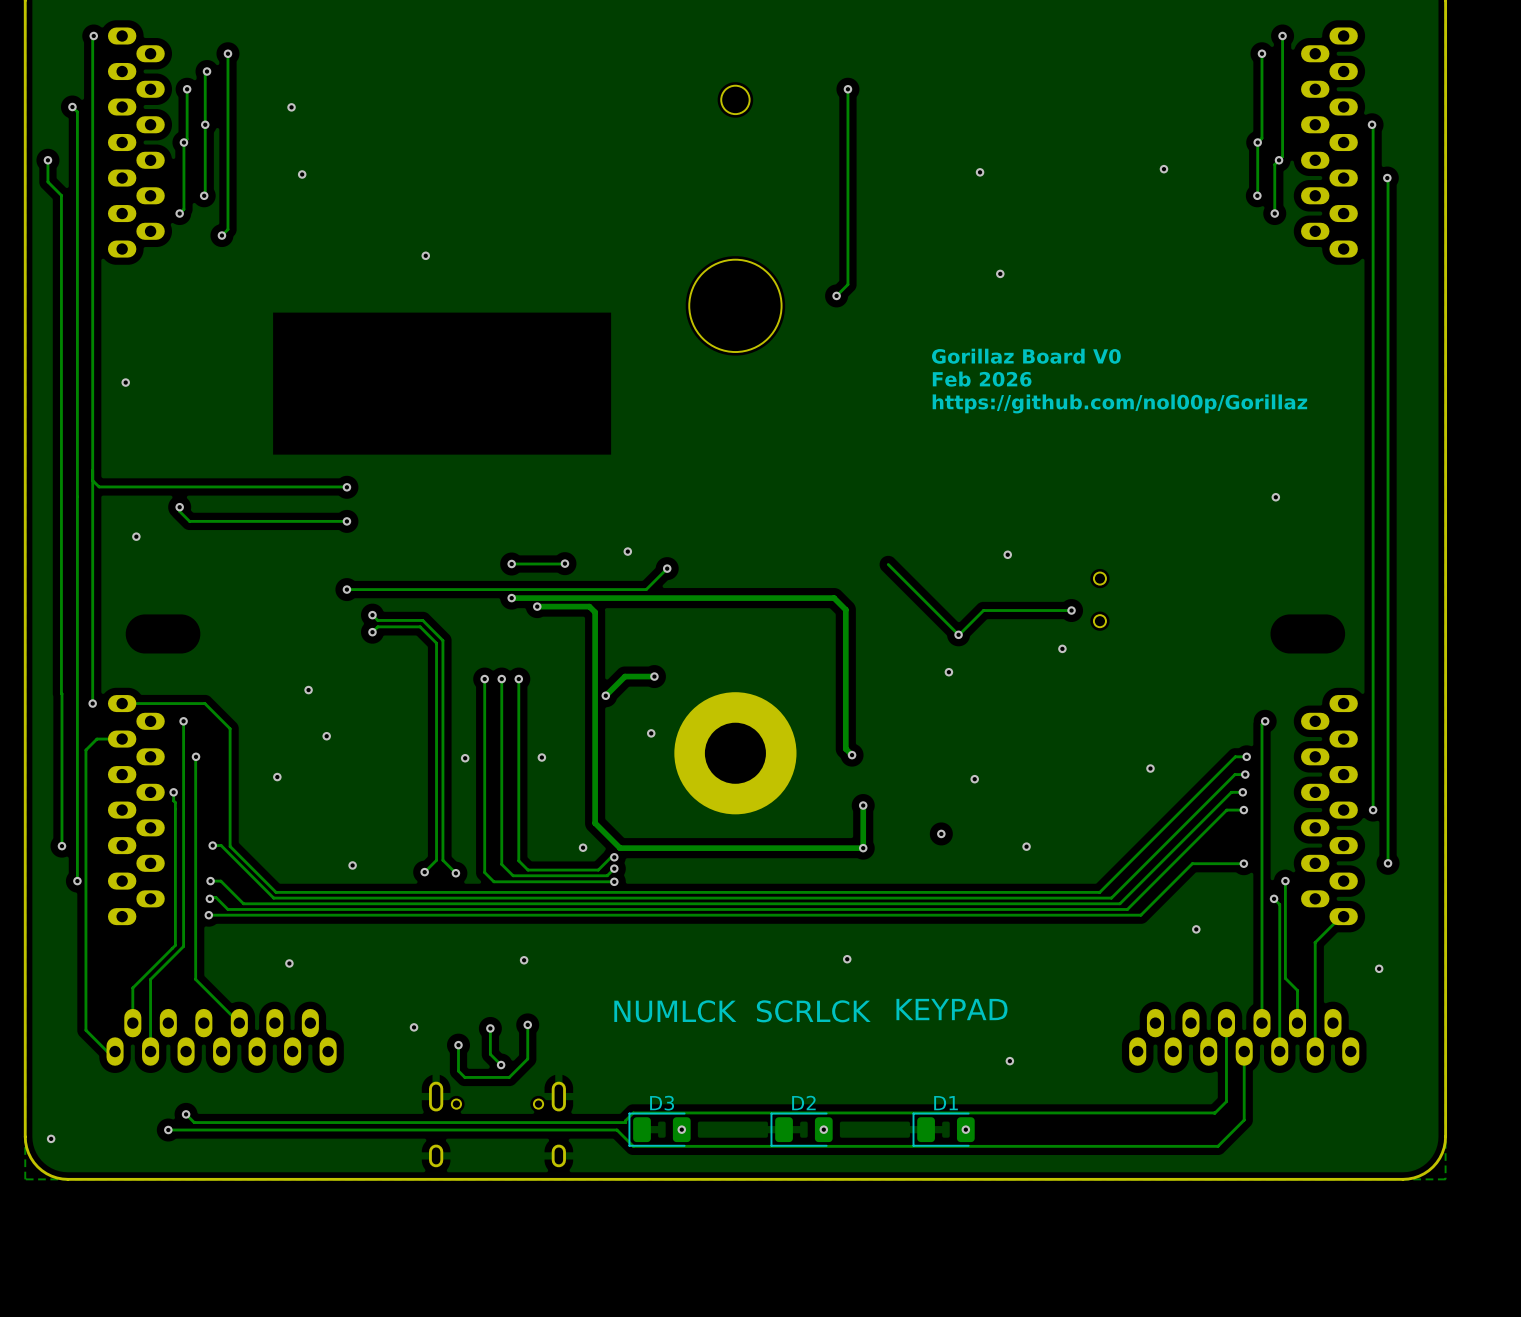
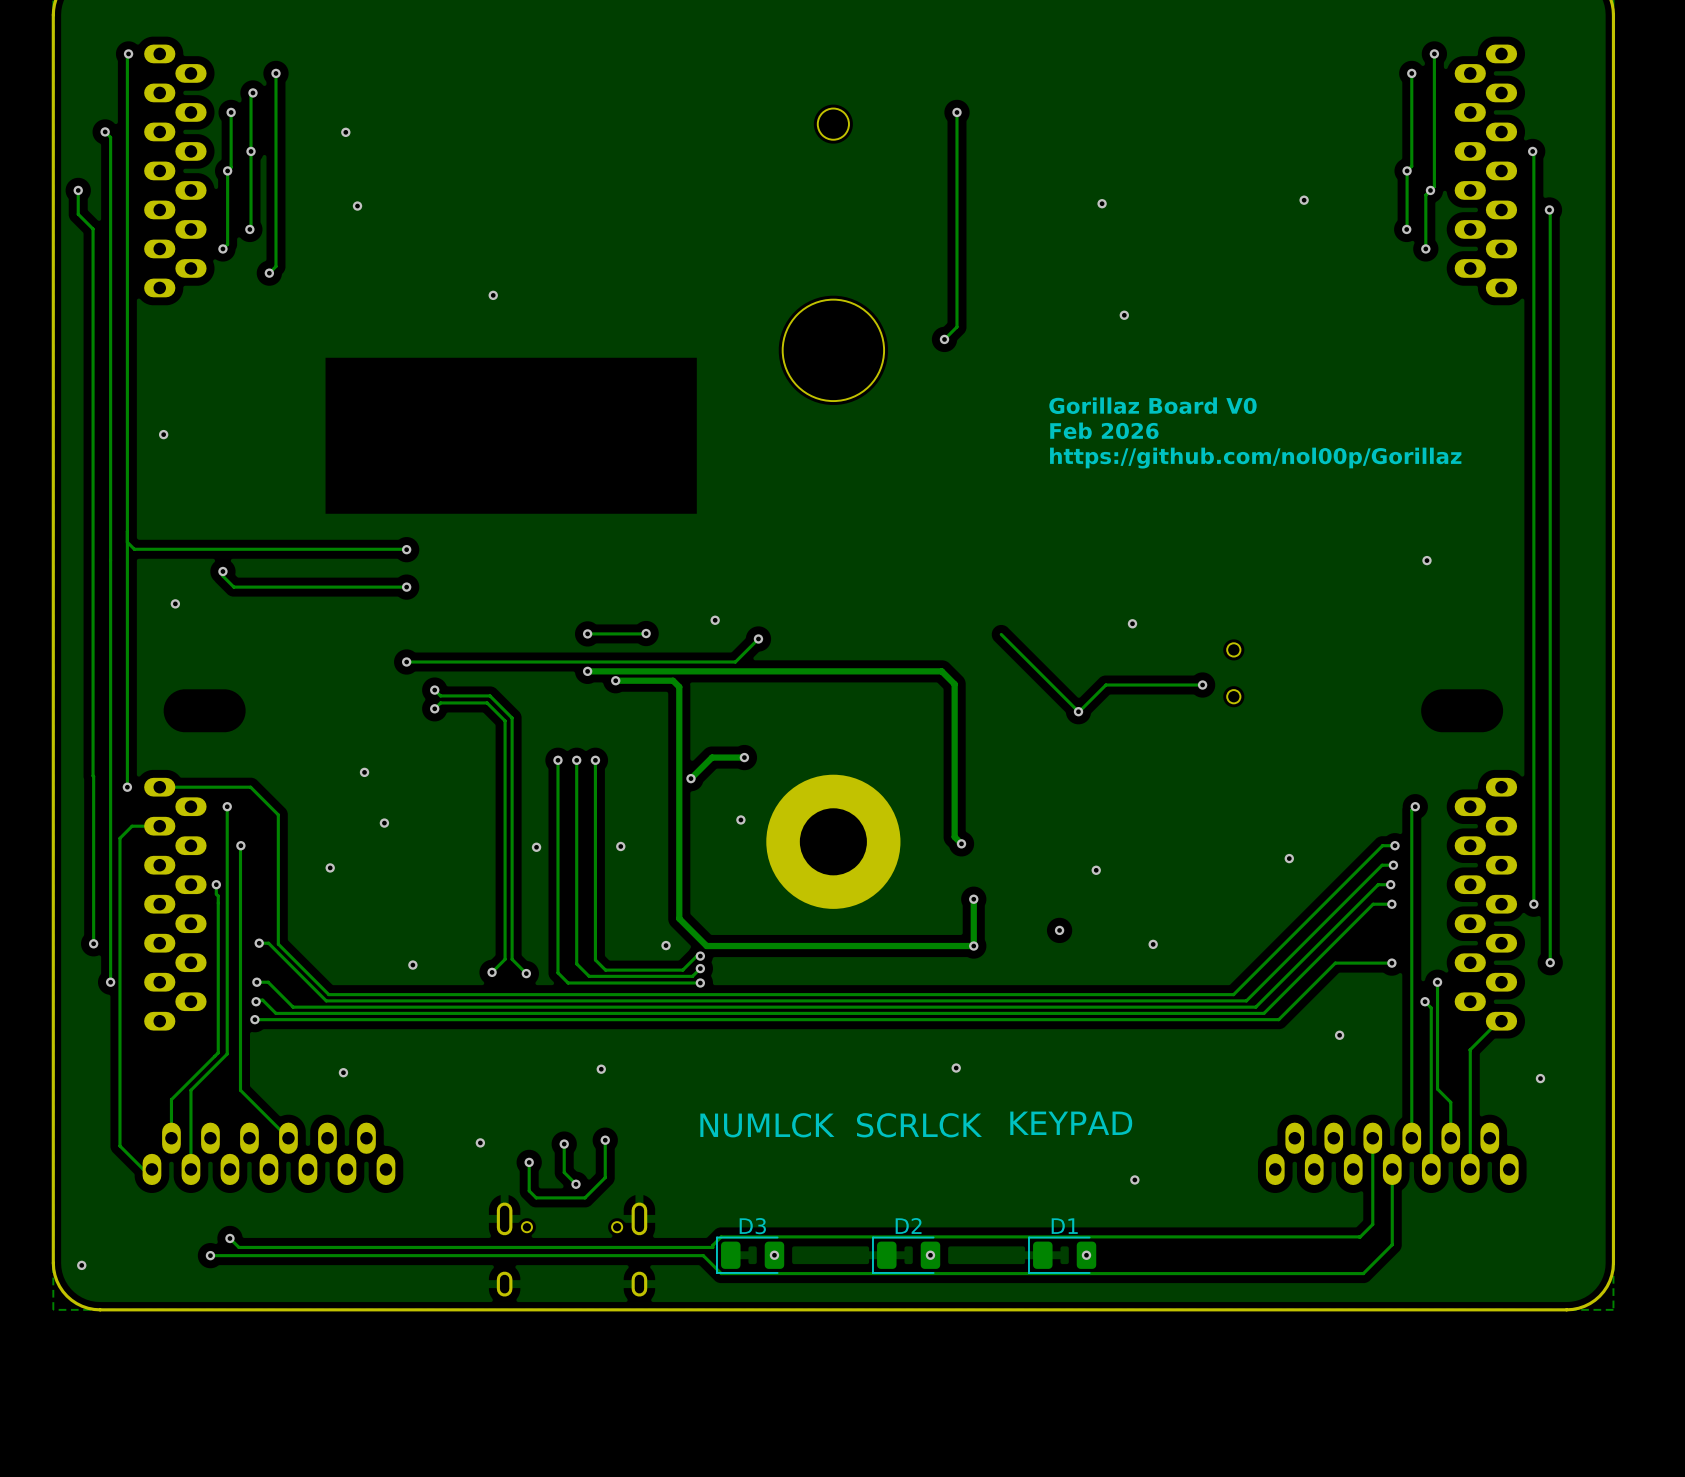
via: (1062, 648) -> none
via: (948, 672) -> none

